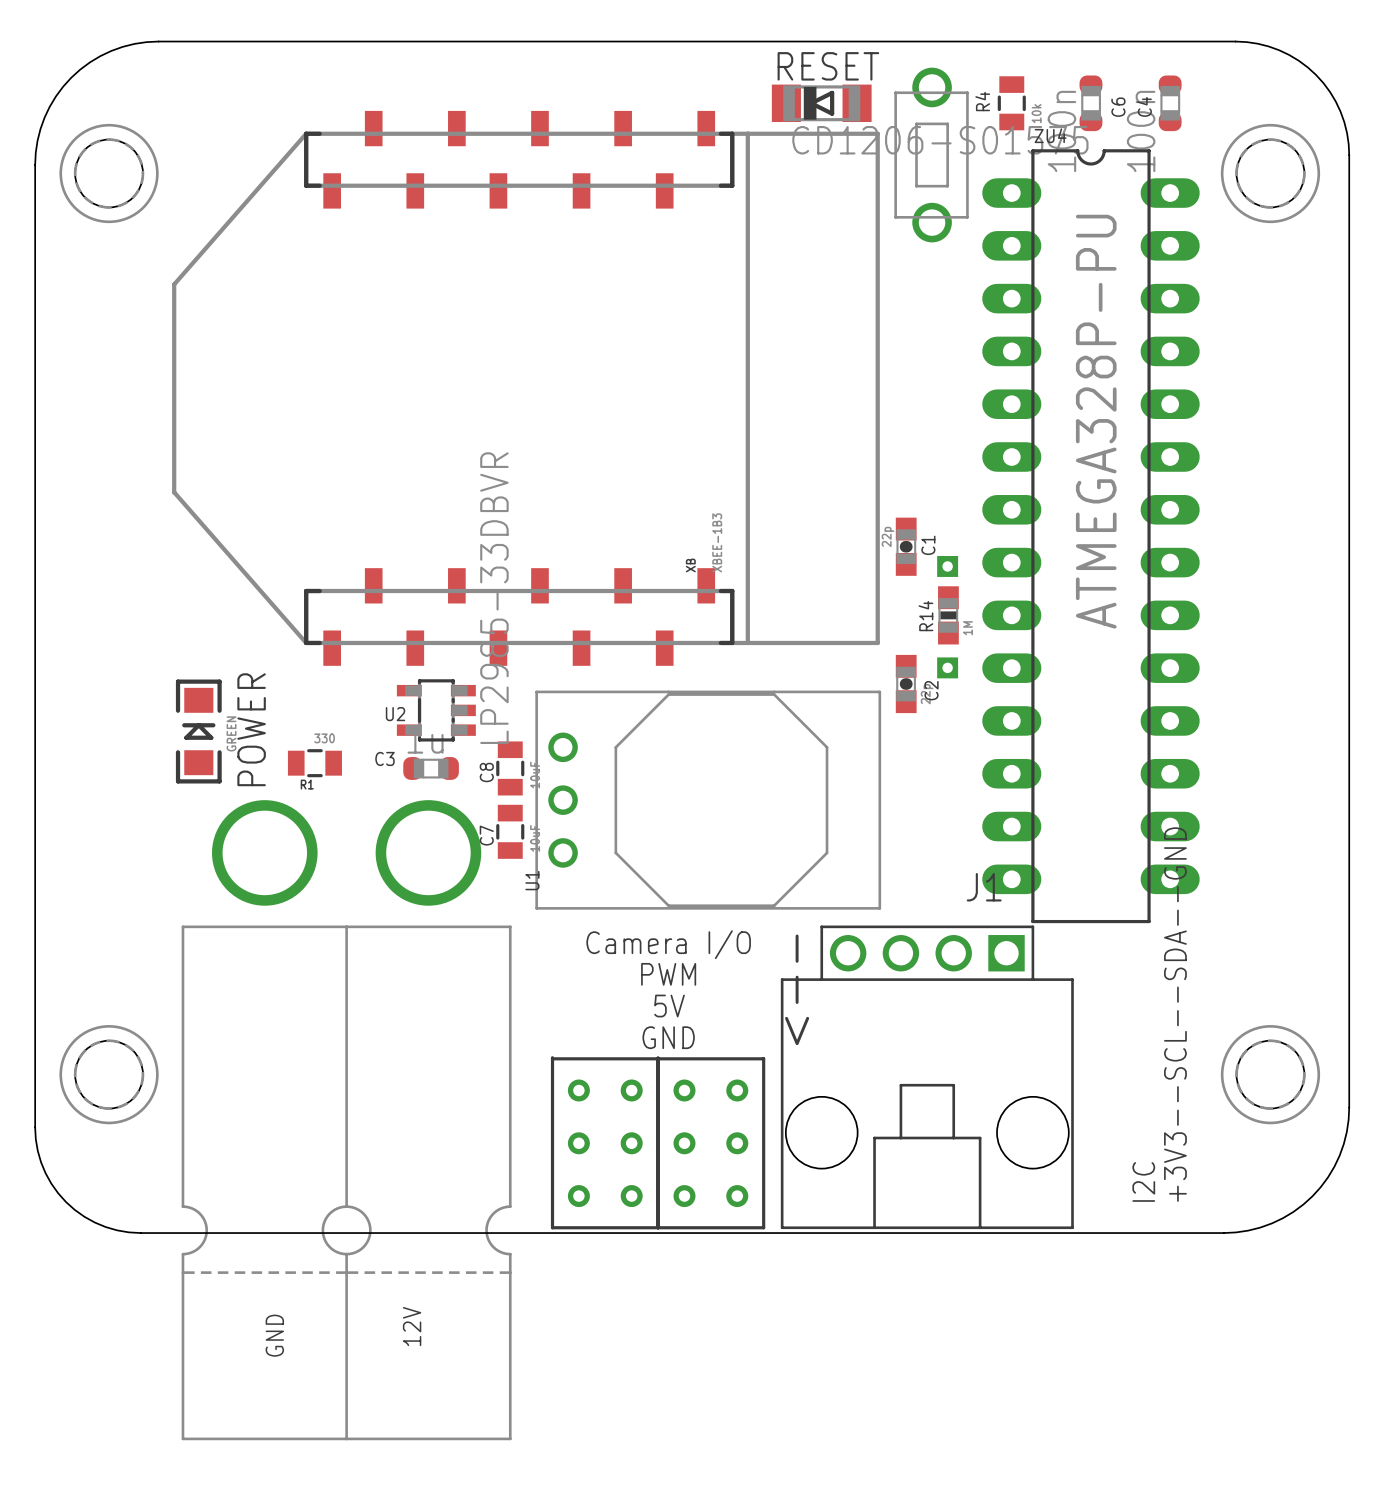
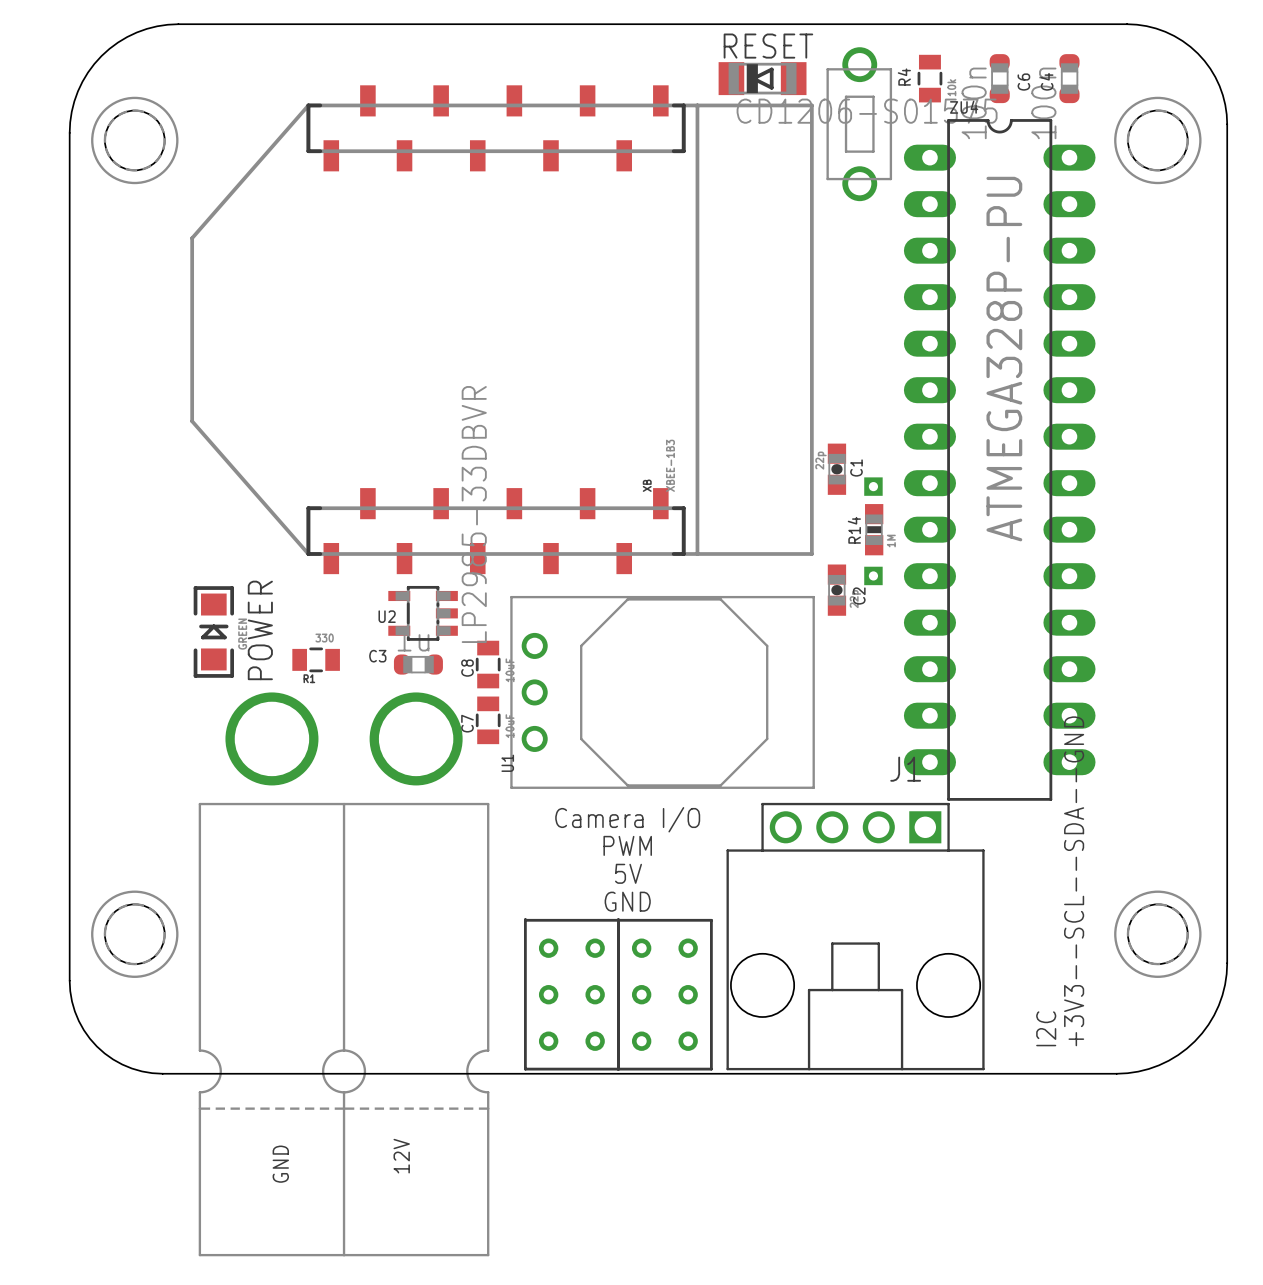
text: <-- (797, 989) -> none

